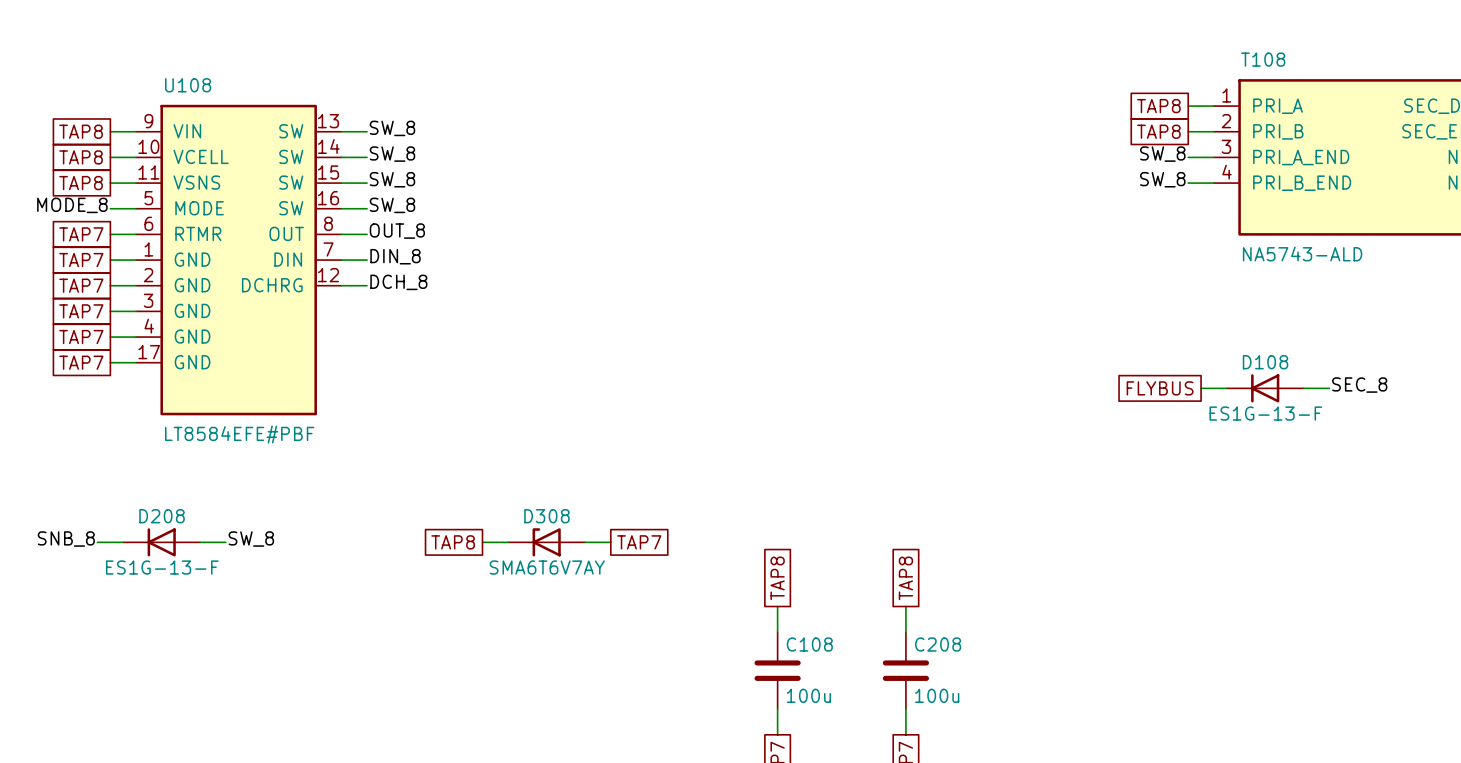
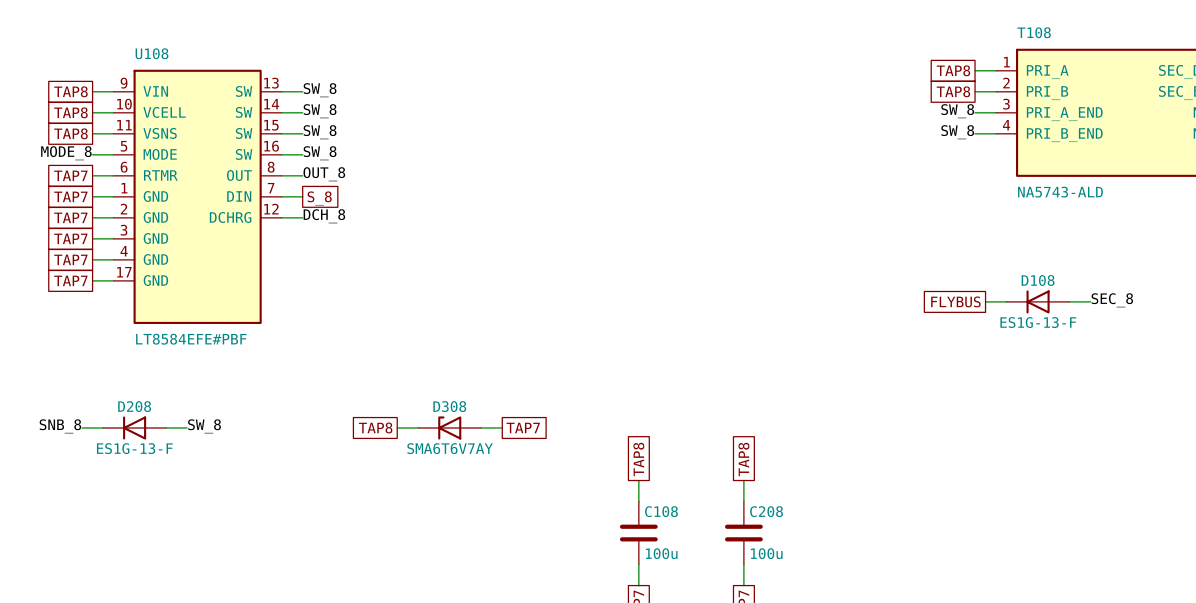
label: DIN_8 (395, 256) -> none
global label: none -> S_8 (319, 198)

